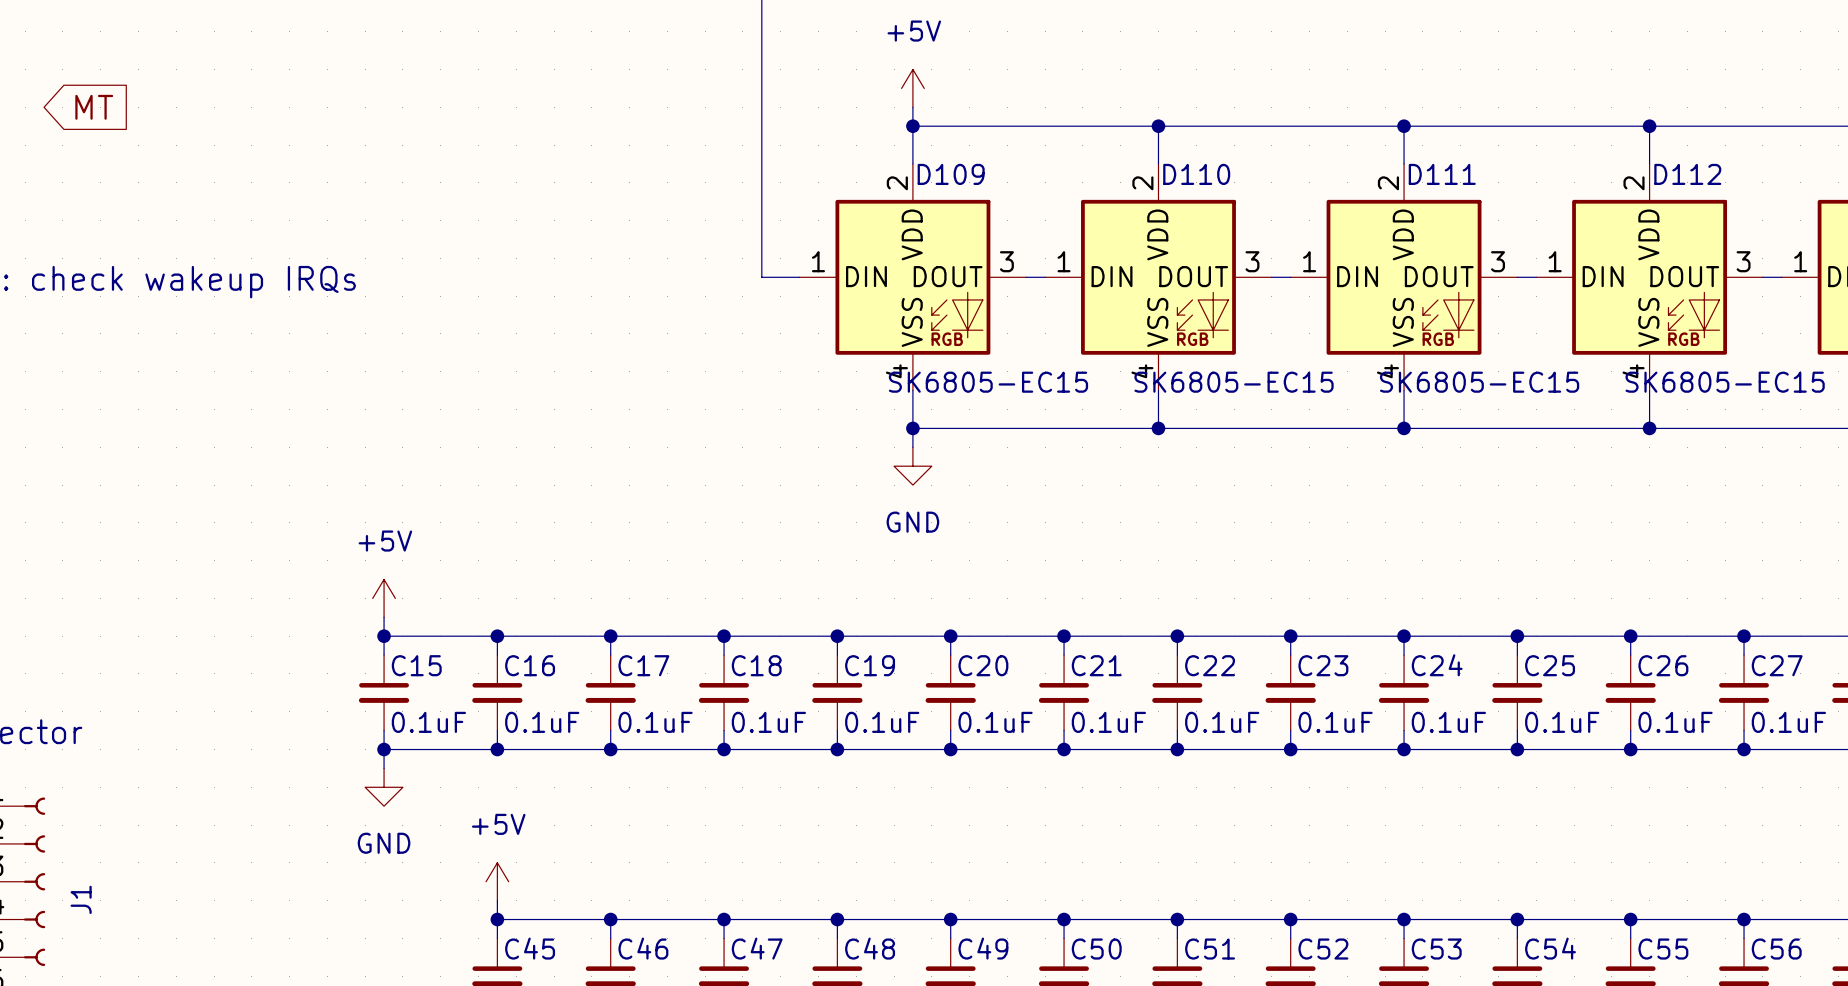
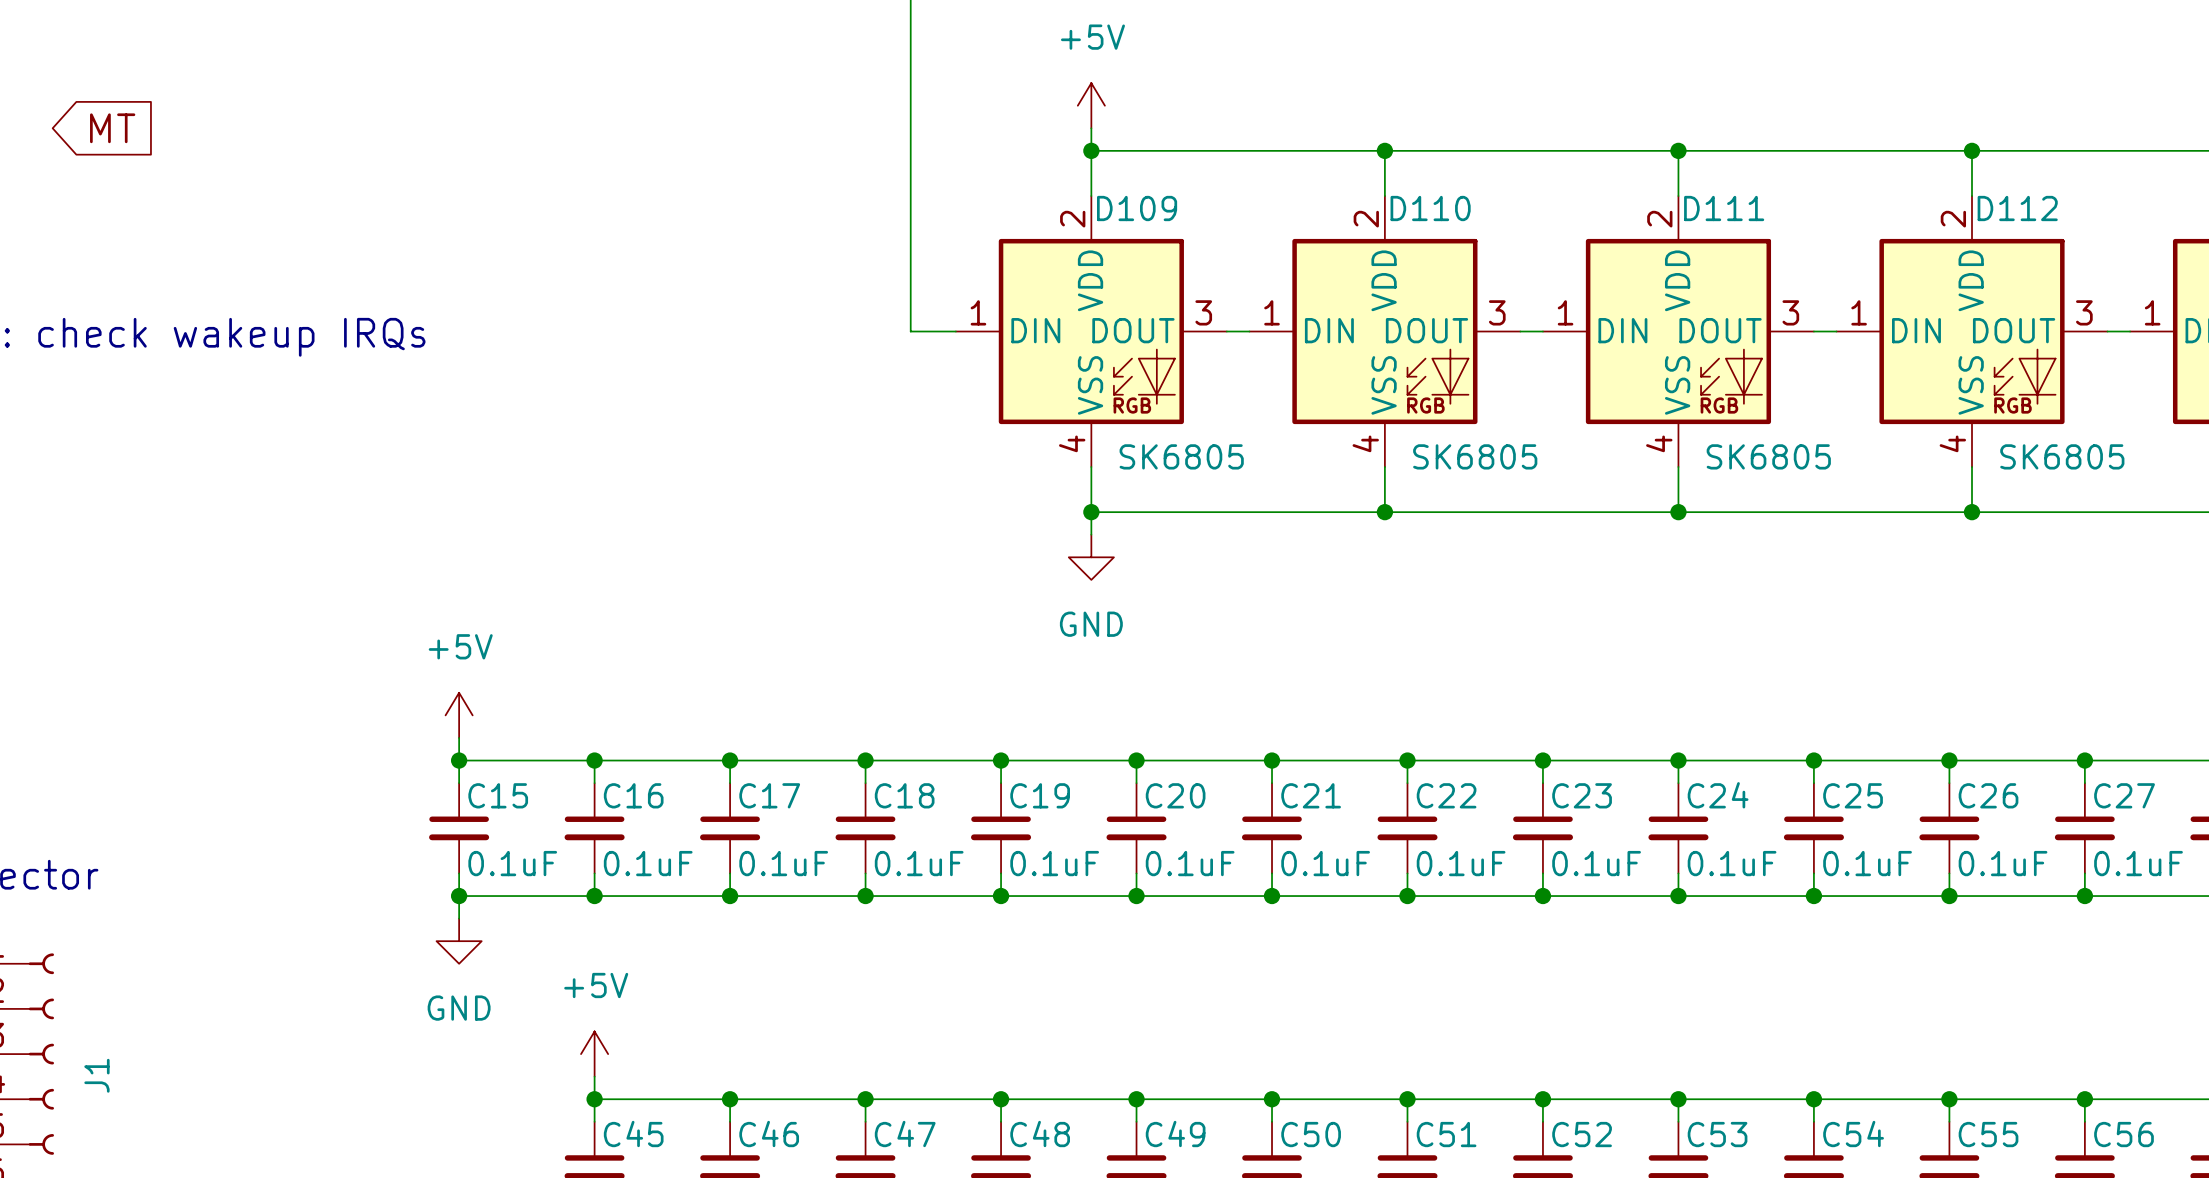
D109 value: SK6805-EC15 (988, 382) -> SK6805 (1181, 456)
D110 value: SK6805-EC15 (1234, 382) -> SK6805 (1475, 456)
D111 value: SK6805-EC15 (1479, 382) -> SK6805 (1768, 456)
D112 value: SK6805-EC15 (1725, 382) -> SK6805 (2062, 456)

